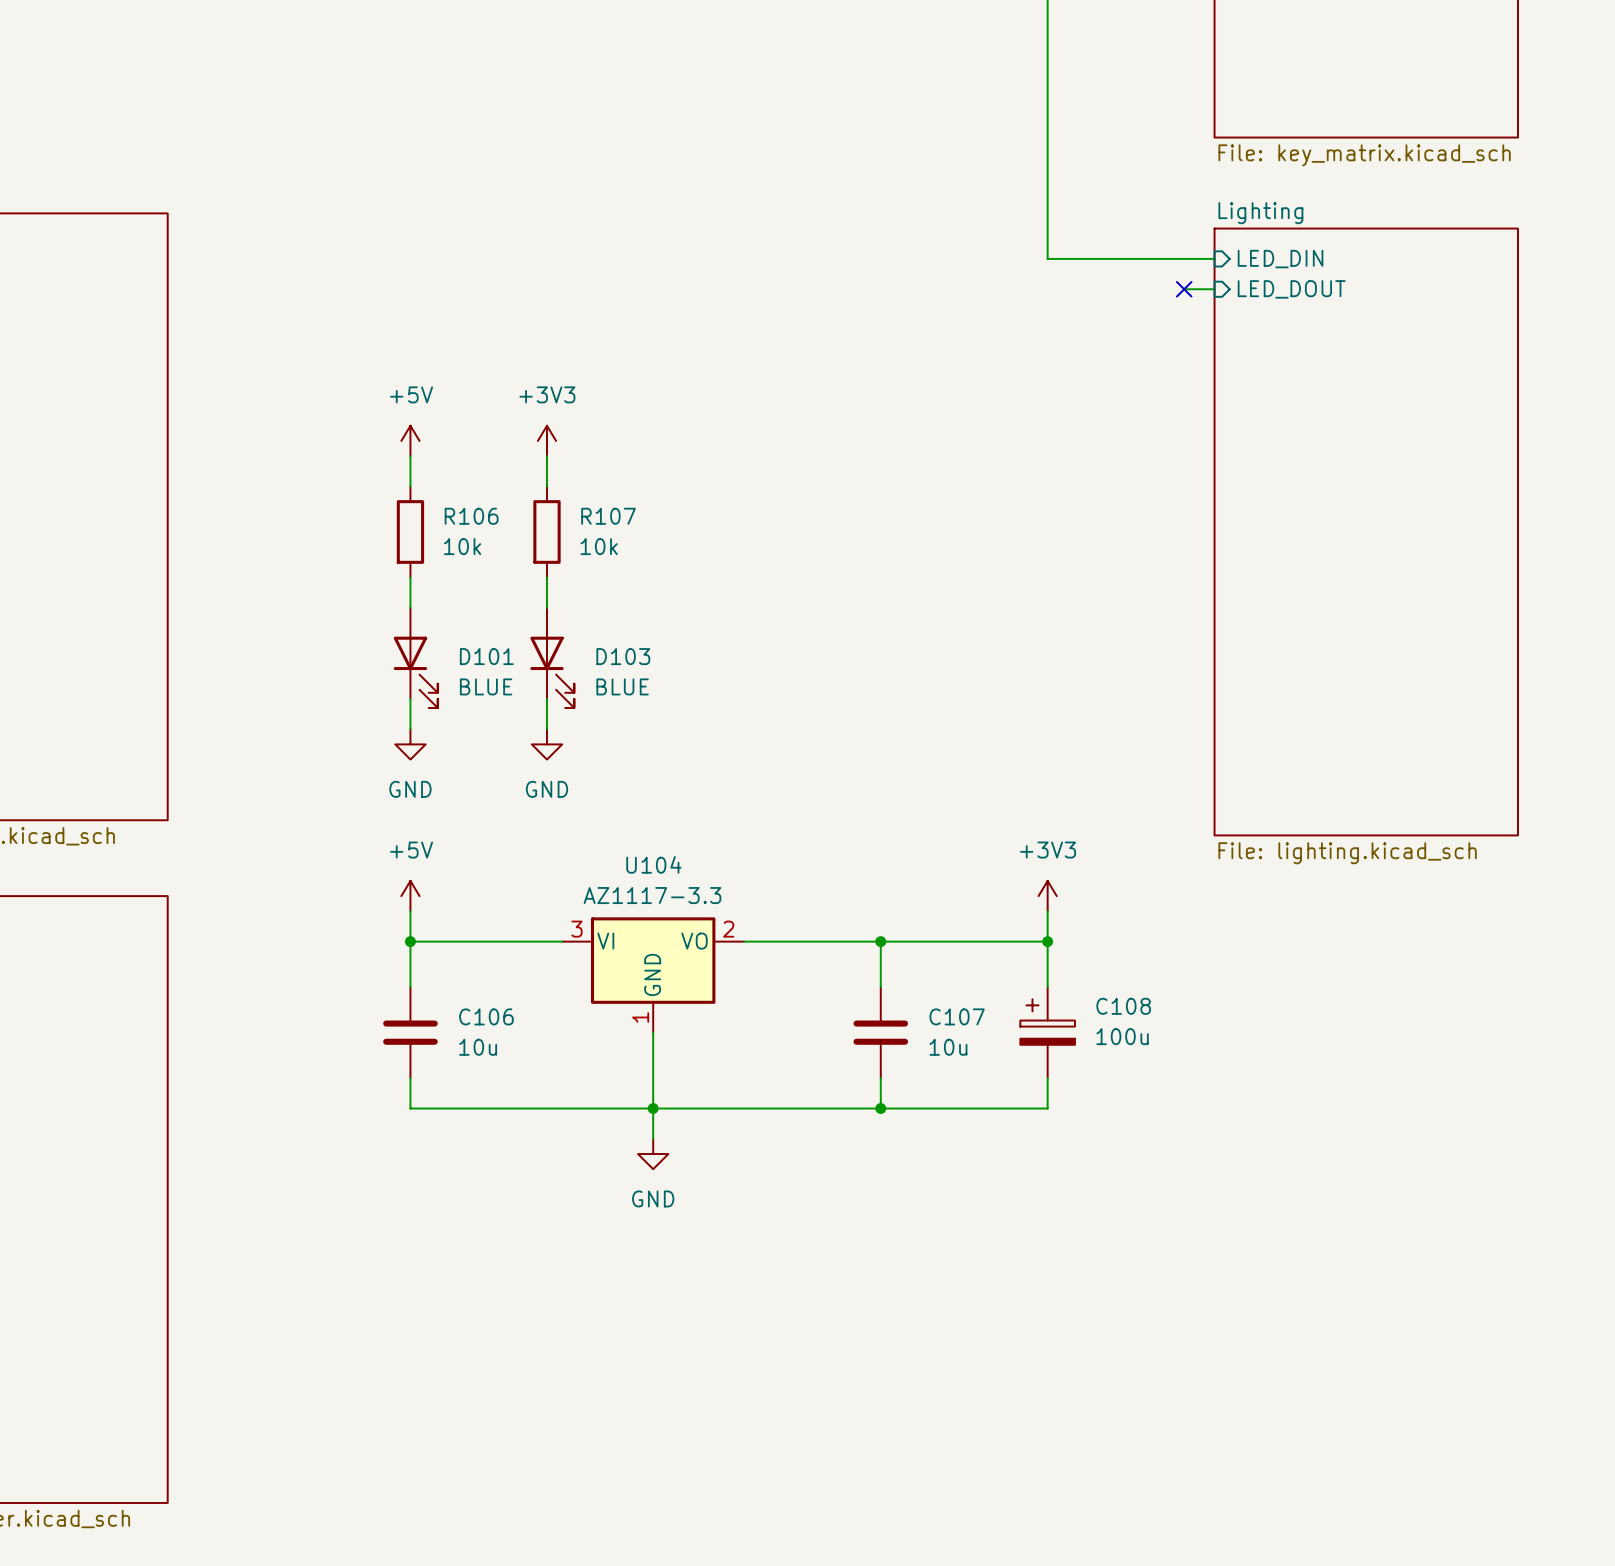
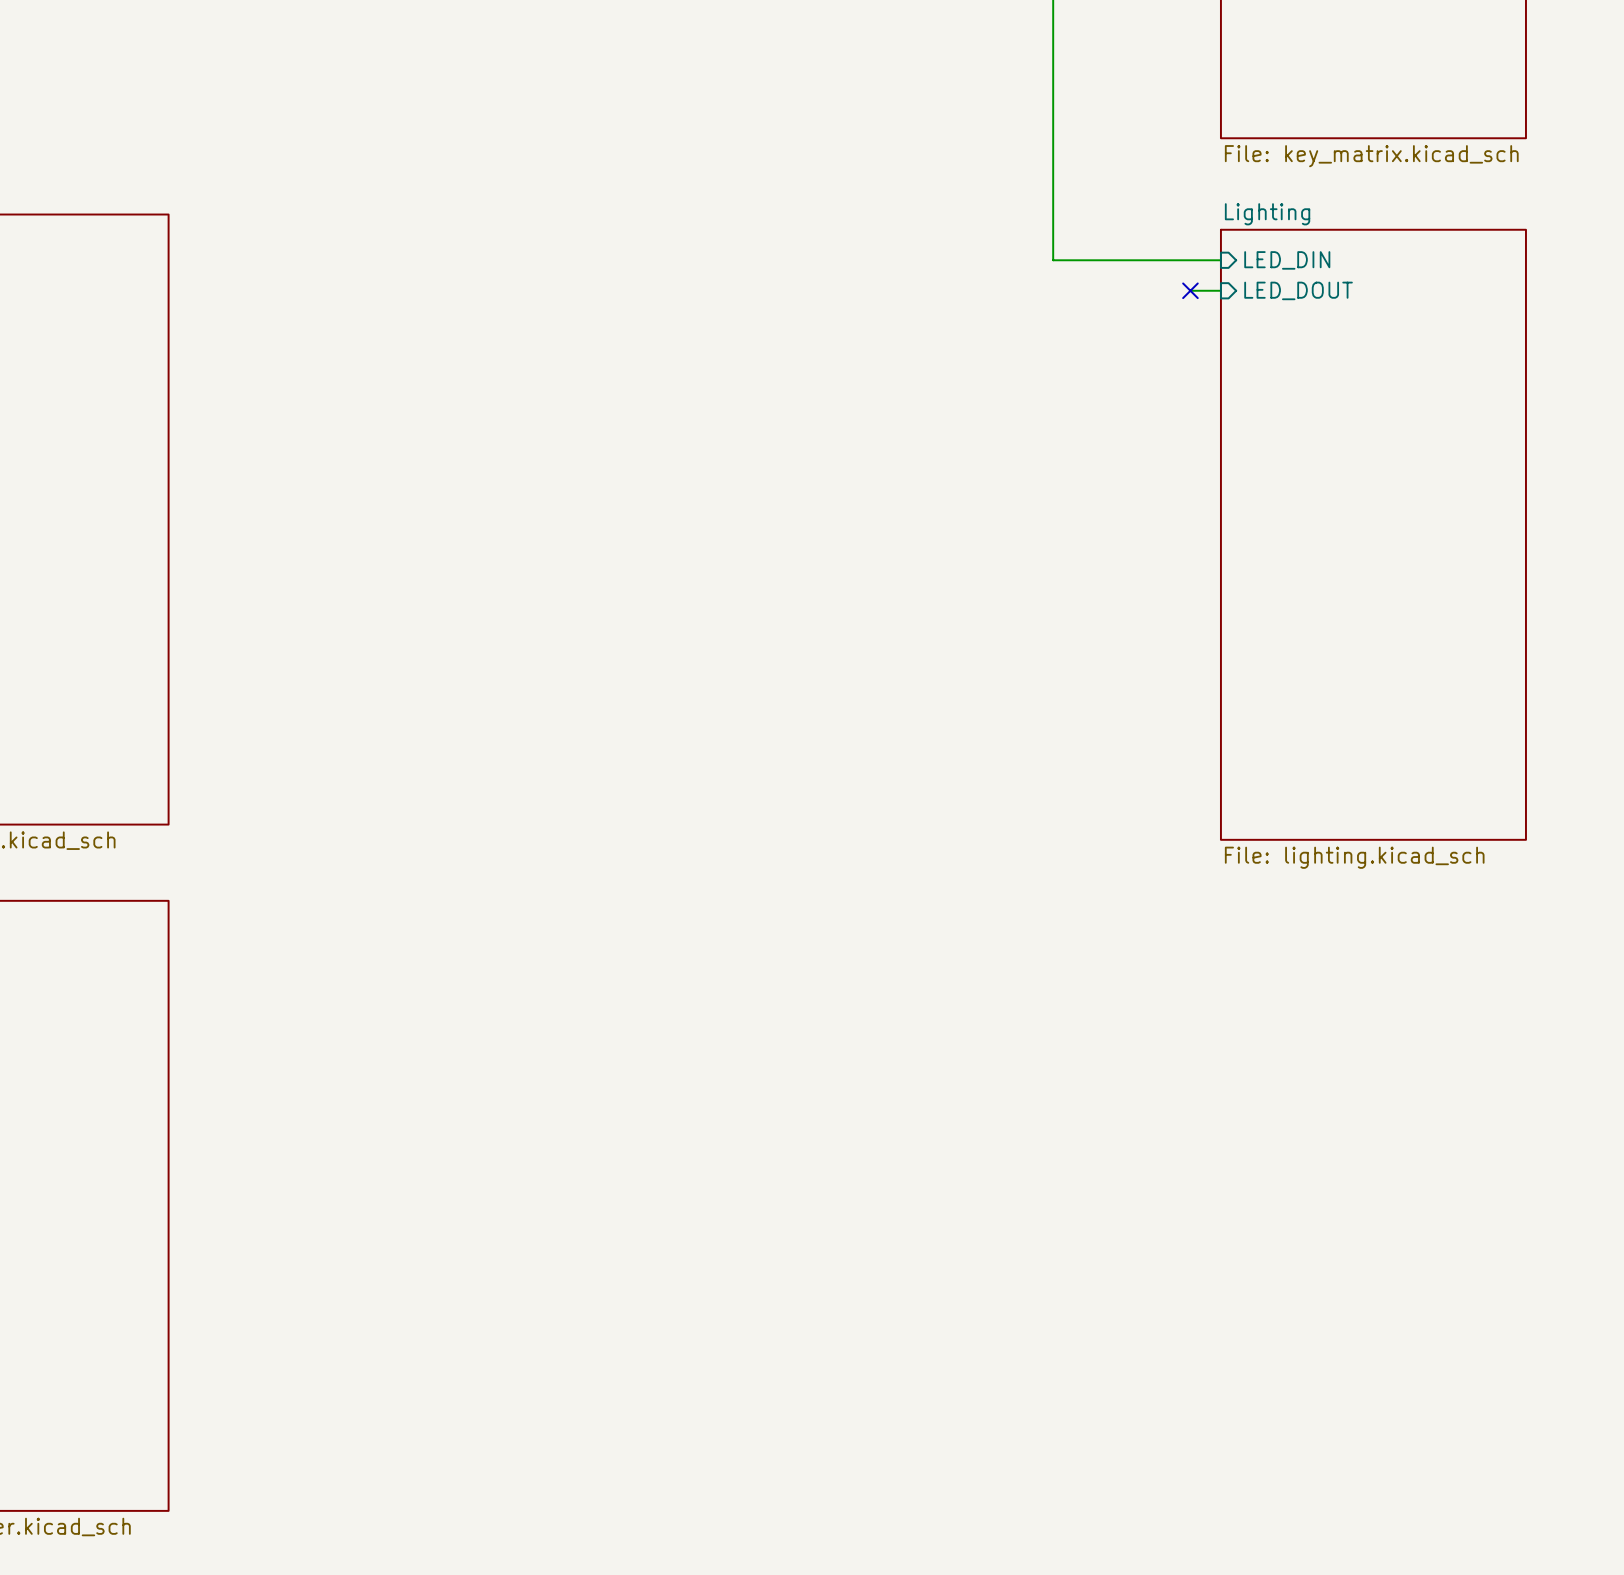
power symbol: +5V (410, 440) -> none
power symbol: +3V3 (547, 440) -> none
wire: (410, 456) (410, 486) -> none
wire: (547, 456) (547, 486) -> none
R106: 10k (410, 531) -> none
R107: 10k (547, 531) -> none
wire: (410, 577) (410, 607) -> none
wire: (547, 577) (547, 607) -> none
D101: BLUE (415, 657) -> none
D103: BLUE (552, 657) -> none
wire: (410, 698) (410, 729) -> none
wire: (547, 698) (547, 729) -> none
power symbol: GND (410, 744) -> none
power symbol: GND (547, 744) -> none
power symbol: +5V (410, 896) -> none
power symbol: +3V3 (1047, 896) -> none
wire: (410, 911) (410, 987) -> none
wire: (1047, 911) (1047, 987) -> none
wire: (410, 941) (562, 941) -> none
junction: (410, 941) -> none
wire: (744, 941) (1047, 941) -> none
wire: (880, 941) (880, 987) -> none
junction: (880, 941) -> none
junction: (1047, 941) -> none
U104: AZ1117-3.3 (653, 975) -> none
C106: 10u (410, 1032) -> none
wire: (653, 1032) (653, 1138) -> none
C107: 10u (880, 1032) -> none
C108: 100u (1047, 1032) -> none
wire: (410, 1078) (410, 1108) (1047, 1108) (1047, 1078) -> none
wire: (880, 1078) (880, 1108) -> none
junction: (653, 1108) -> none
junction: (880, 1108) -> none
power symbol: GND (653, 1154) -> none

